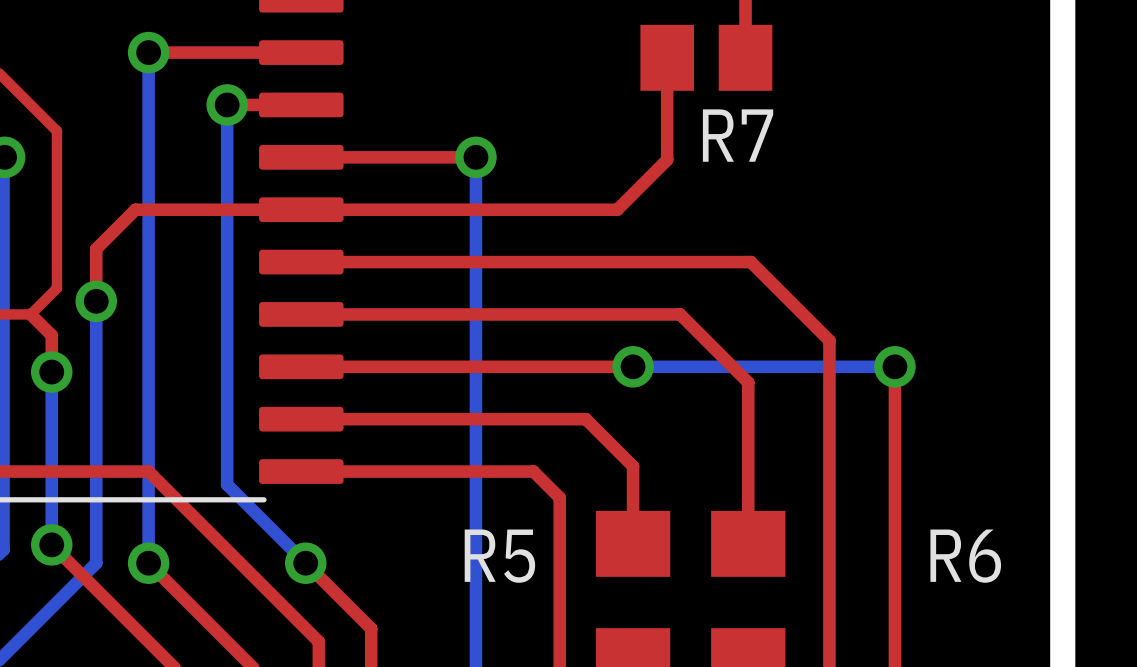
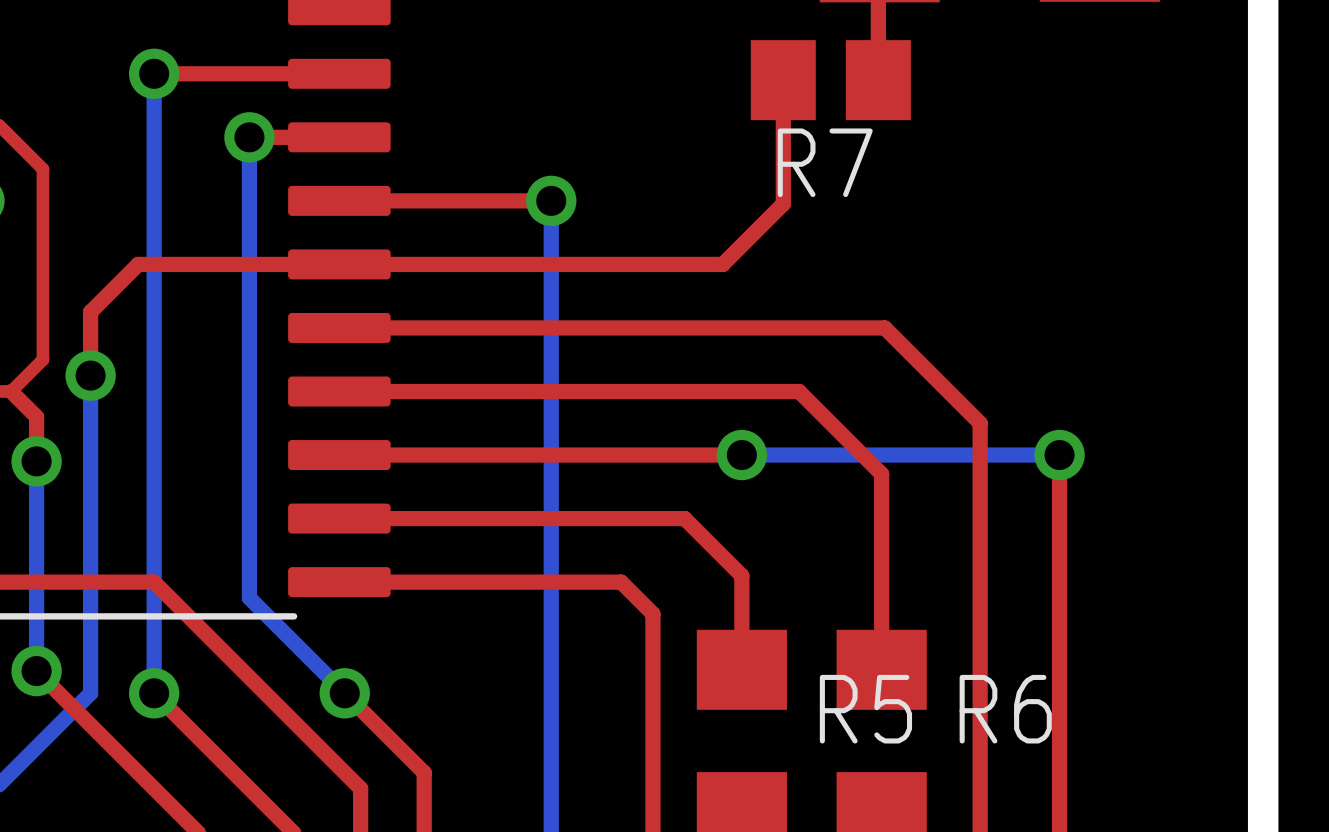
R7 name position: R7 (738, 135) -> R7 (825, 162)
R5 name position: R5 (499, 556) -> R5 (865, 709)
R6 name position: R6 (965, 556) -> R6 (1005, 709)

